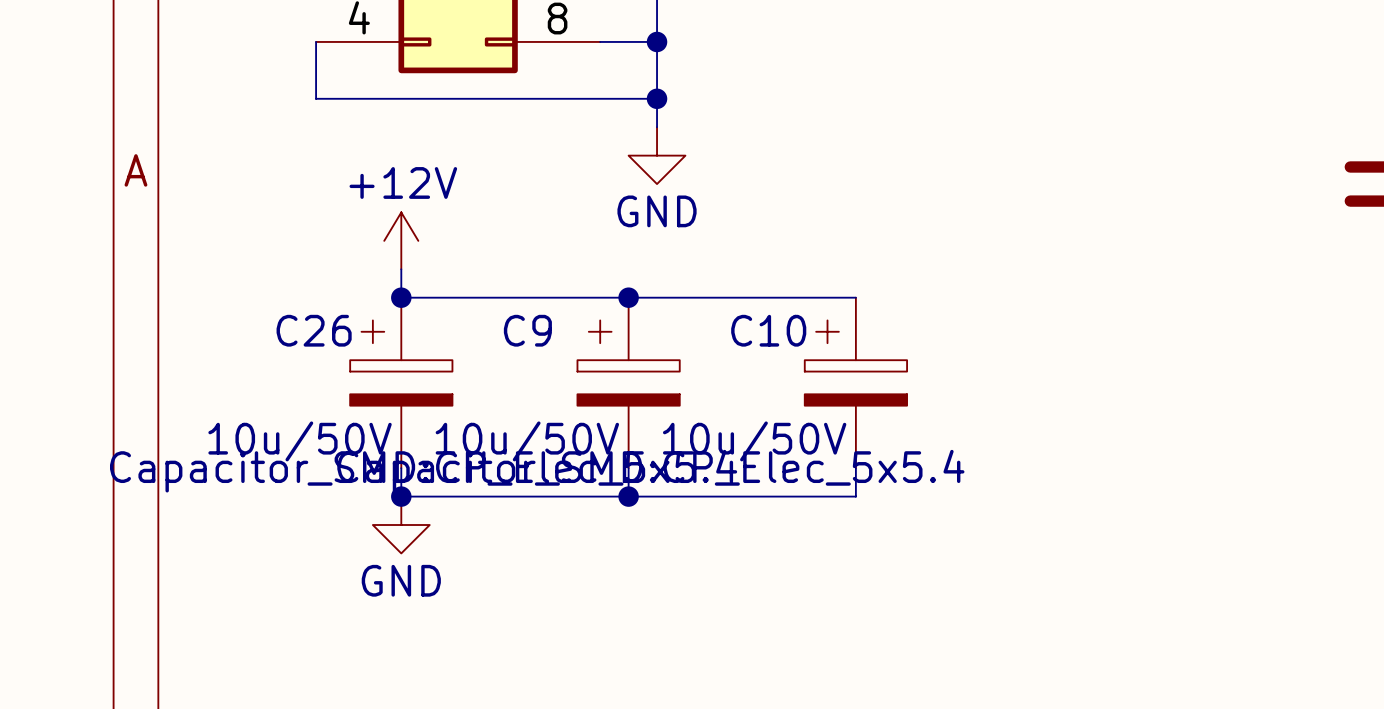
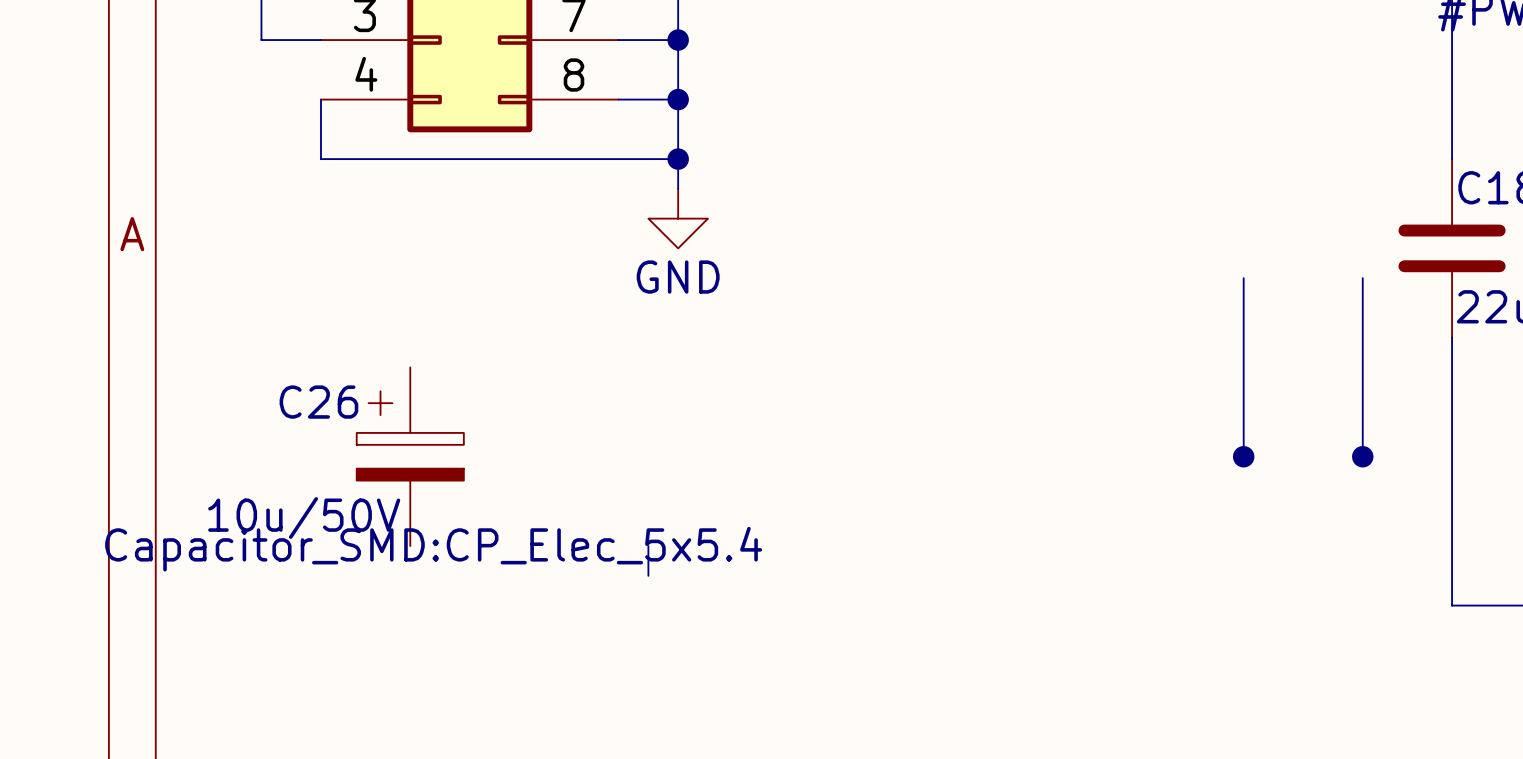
wire: none -> (1243, 278) (1243, 456)
wire: none -> (1362, 278) (1362, 456)
power symbol: +12V (401, 240) -> none
wire: (401, 269) (401, 297) (855, 297) -> none
junction: (401, 297) -> none
junction: (628, 297) -> none
C9: 10u/50V (628, 382) -> none
C10: 10u/50V (855, 382) -> none
junction: none -> (1243, 456)
junction: none -> (1362, 456)
wire: (401, 468) (401, 496) (855, 496) (855, 468) -> none
junction: (401, 496) -> none
junction: (628, 496) -> none
power symbol: GND (401, 525) -> none

